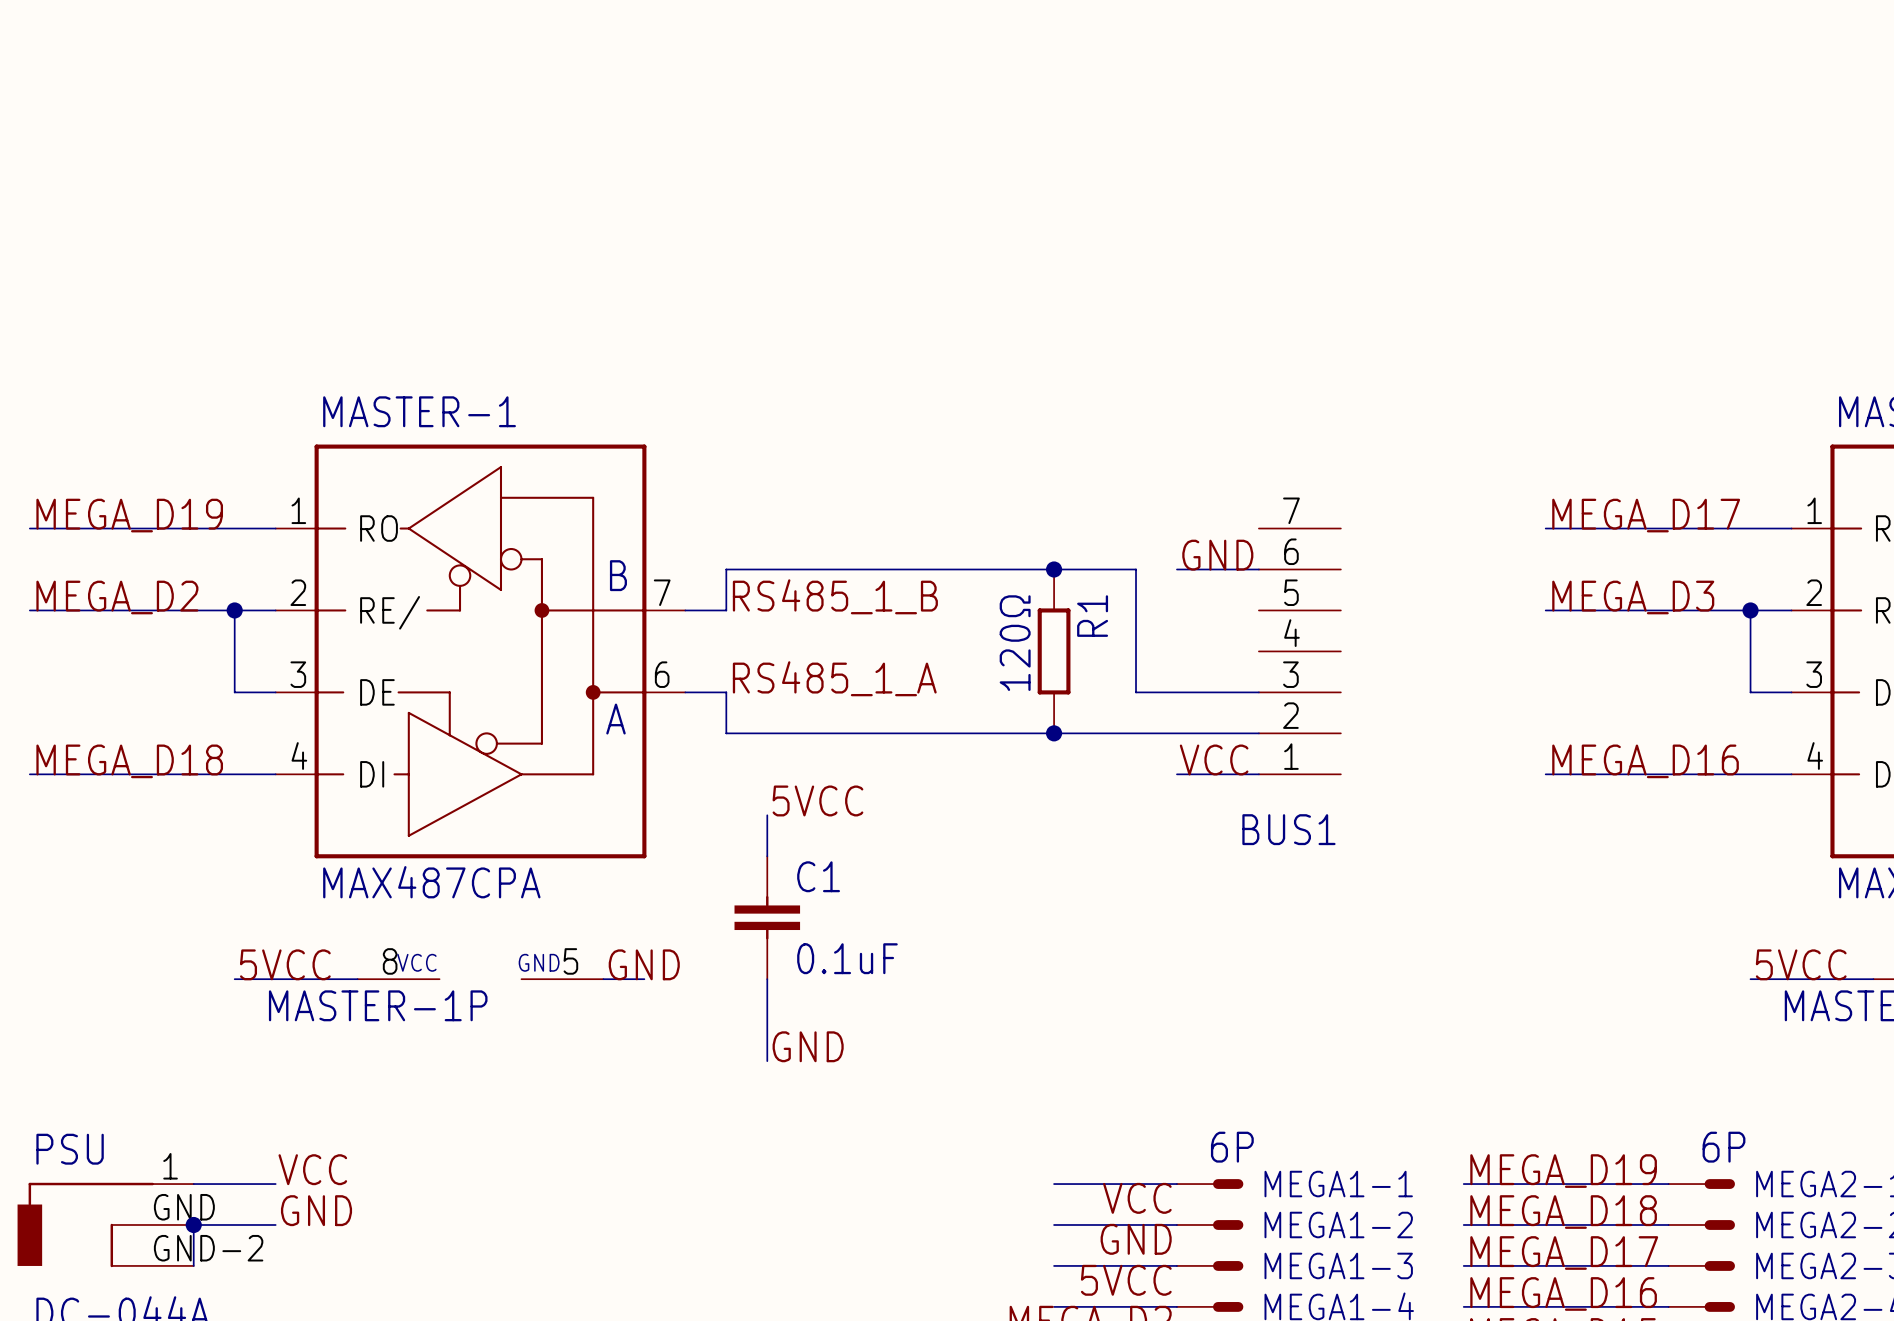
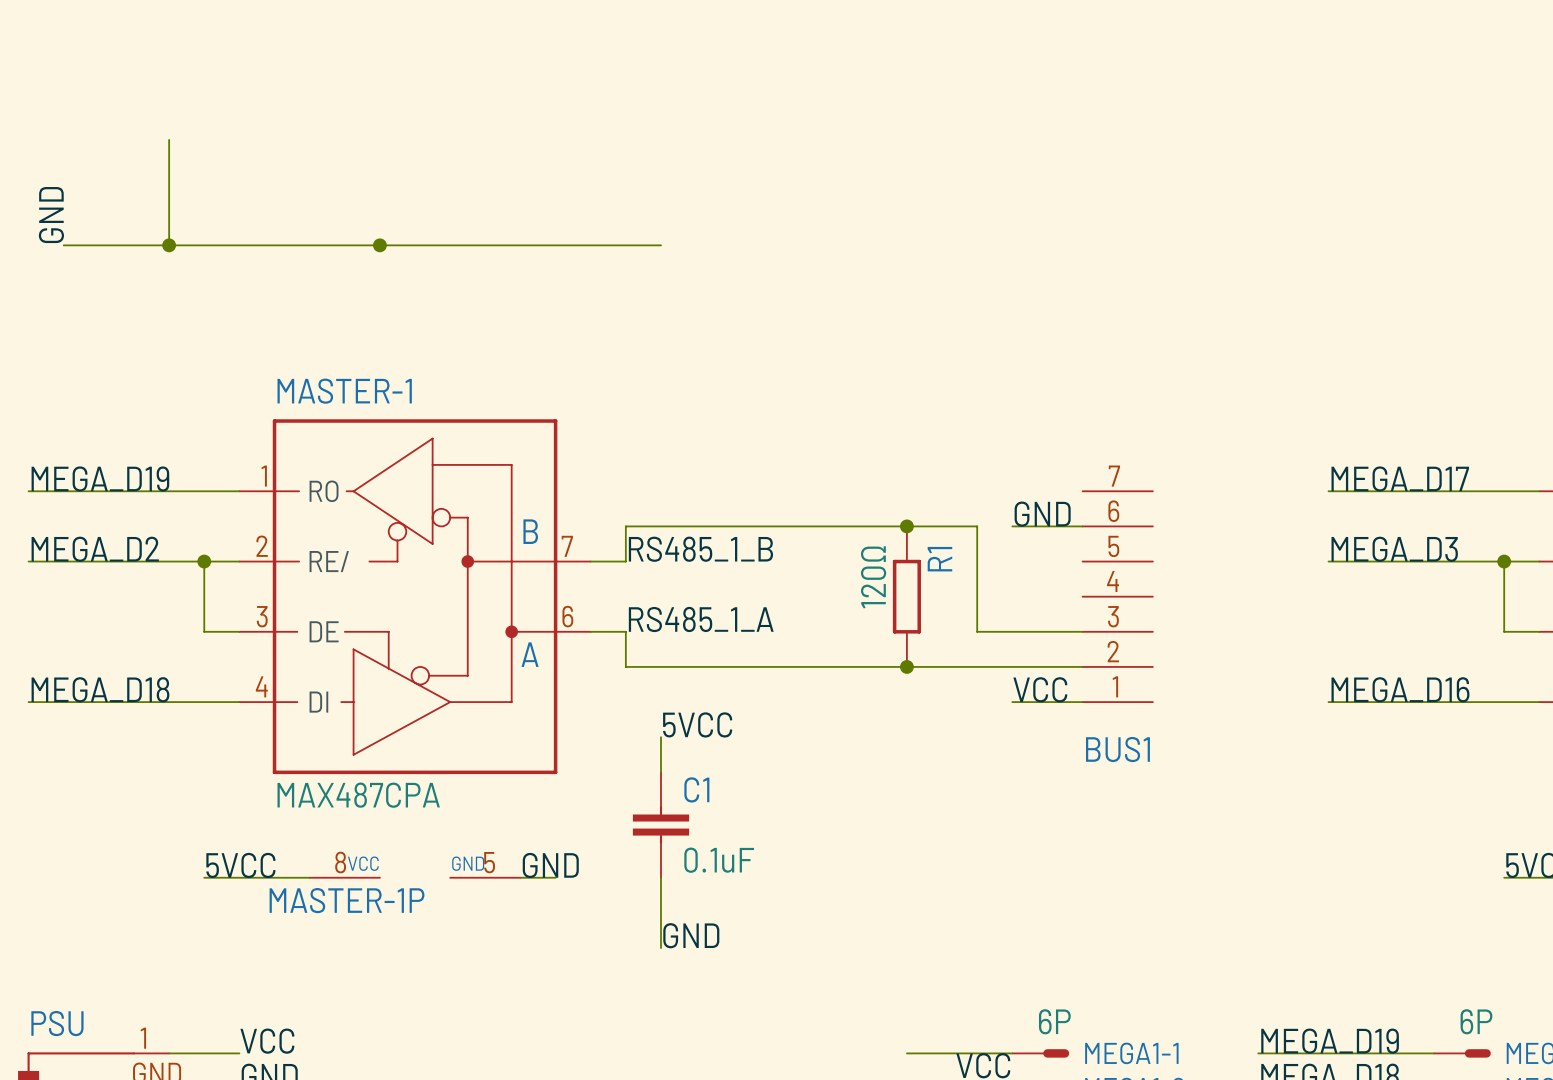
wire: none -> (169, 139) (169, 245)
label: none -> GND (51, 215)
wire: none -> (63, 245) (660, 245)
junction: none -> (169, 245)
junction: none -> (379, 245)

